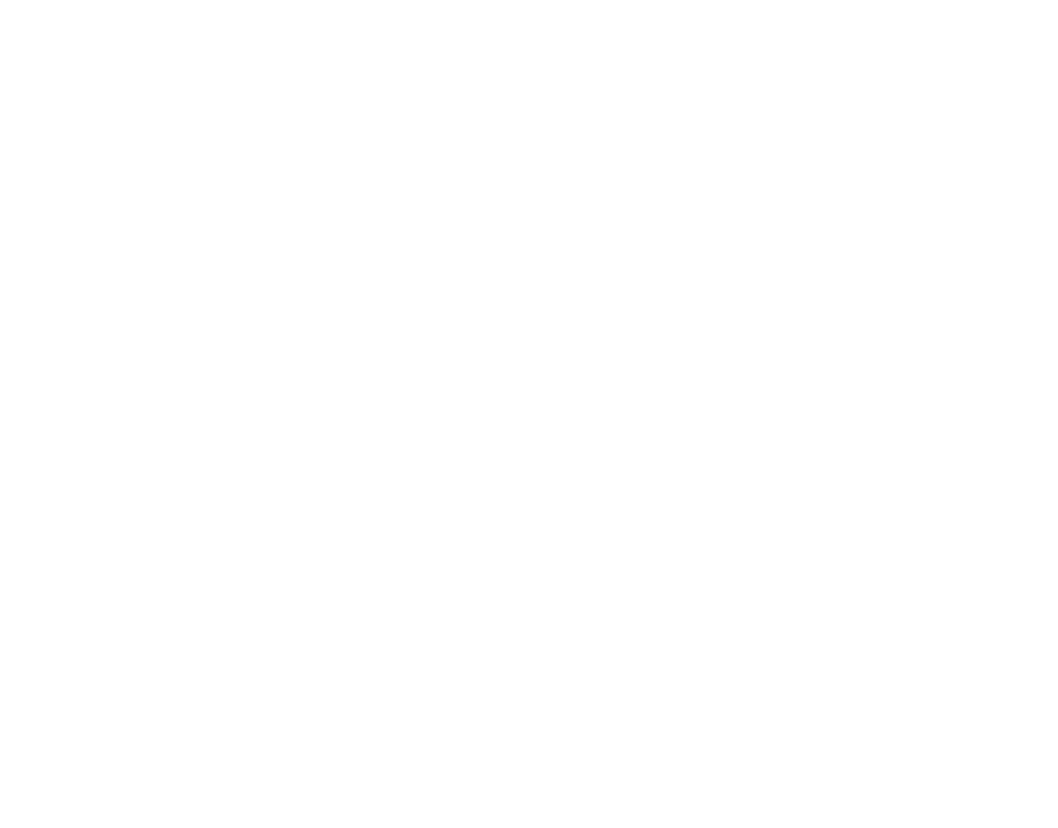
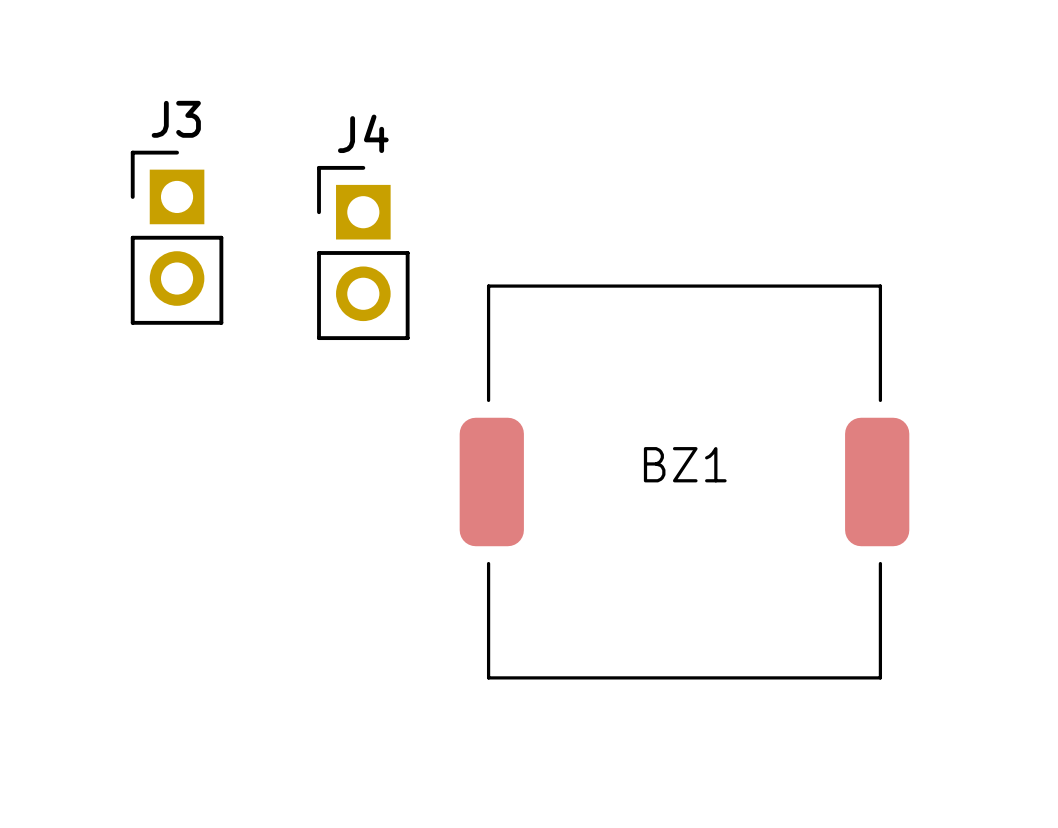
J3: none -> (177, 237)
J4: none -> (363, 252)
BZ1: none -> (684, 481)

